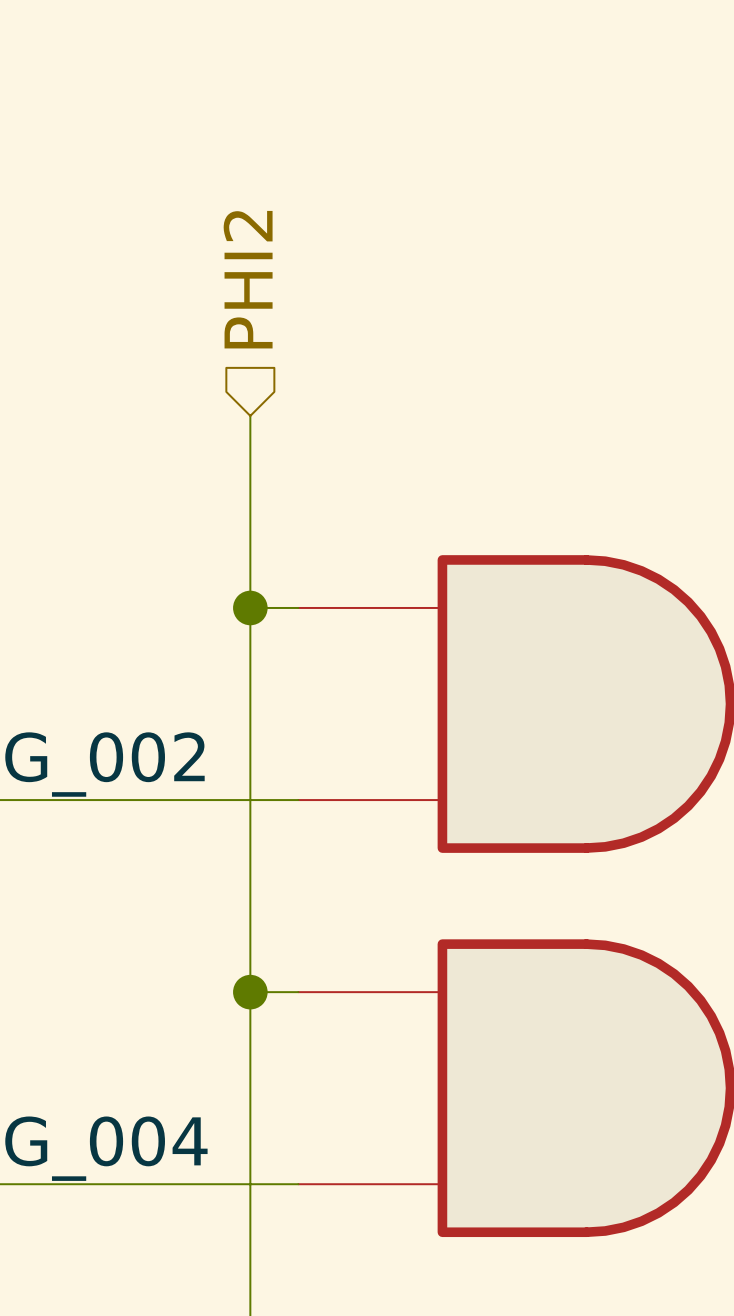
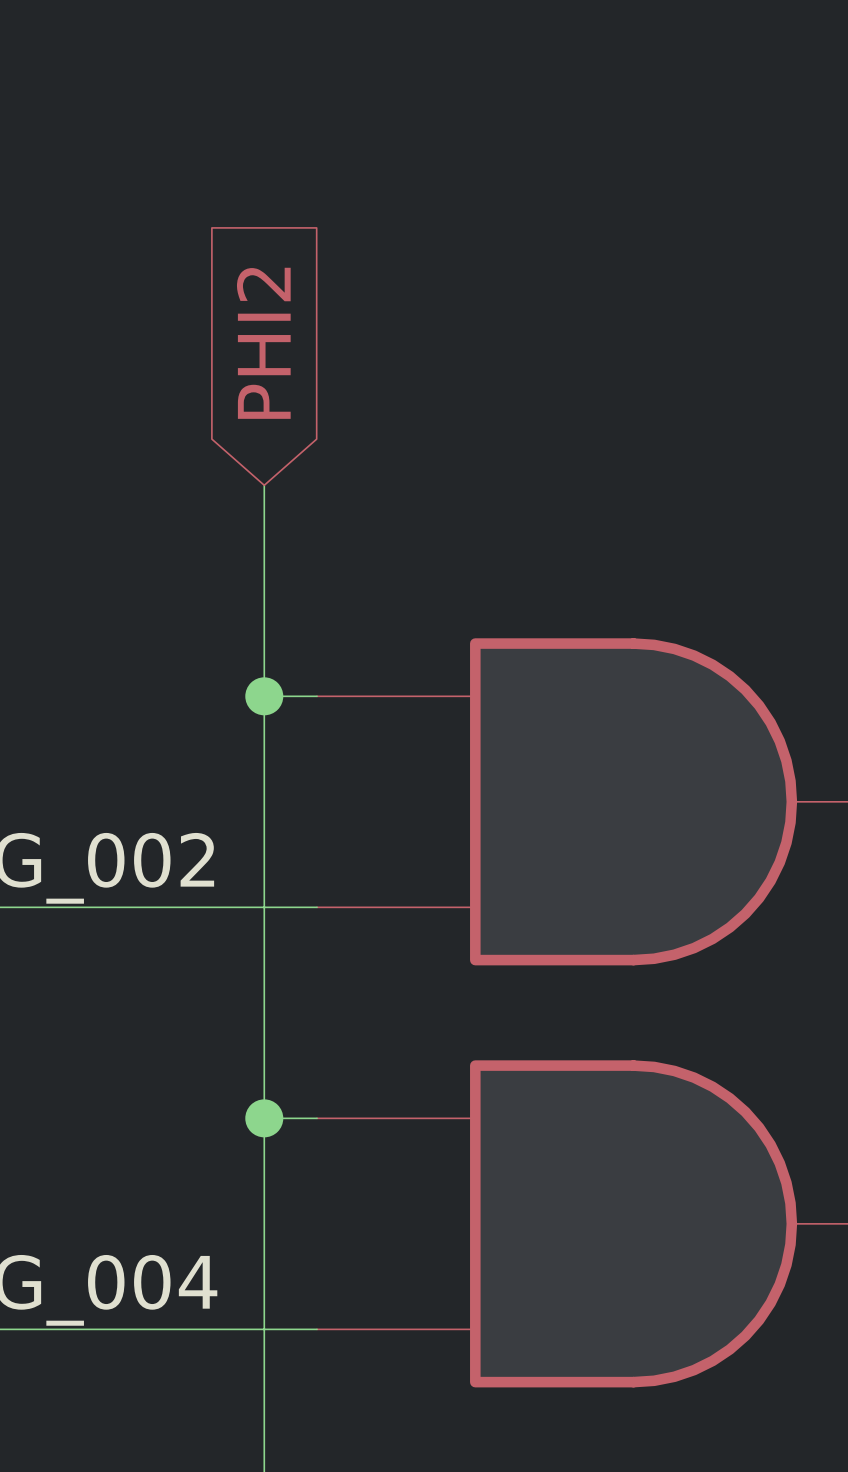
hierarchical label: PHI2 (248, 279) -> none
global label: none -> PHI2 (263, 343)

